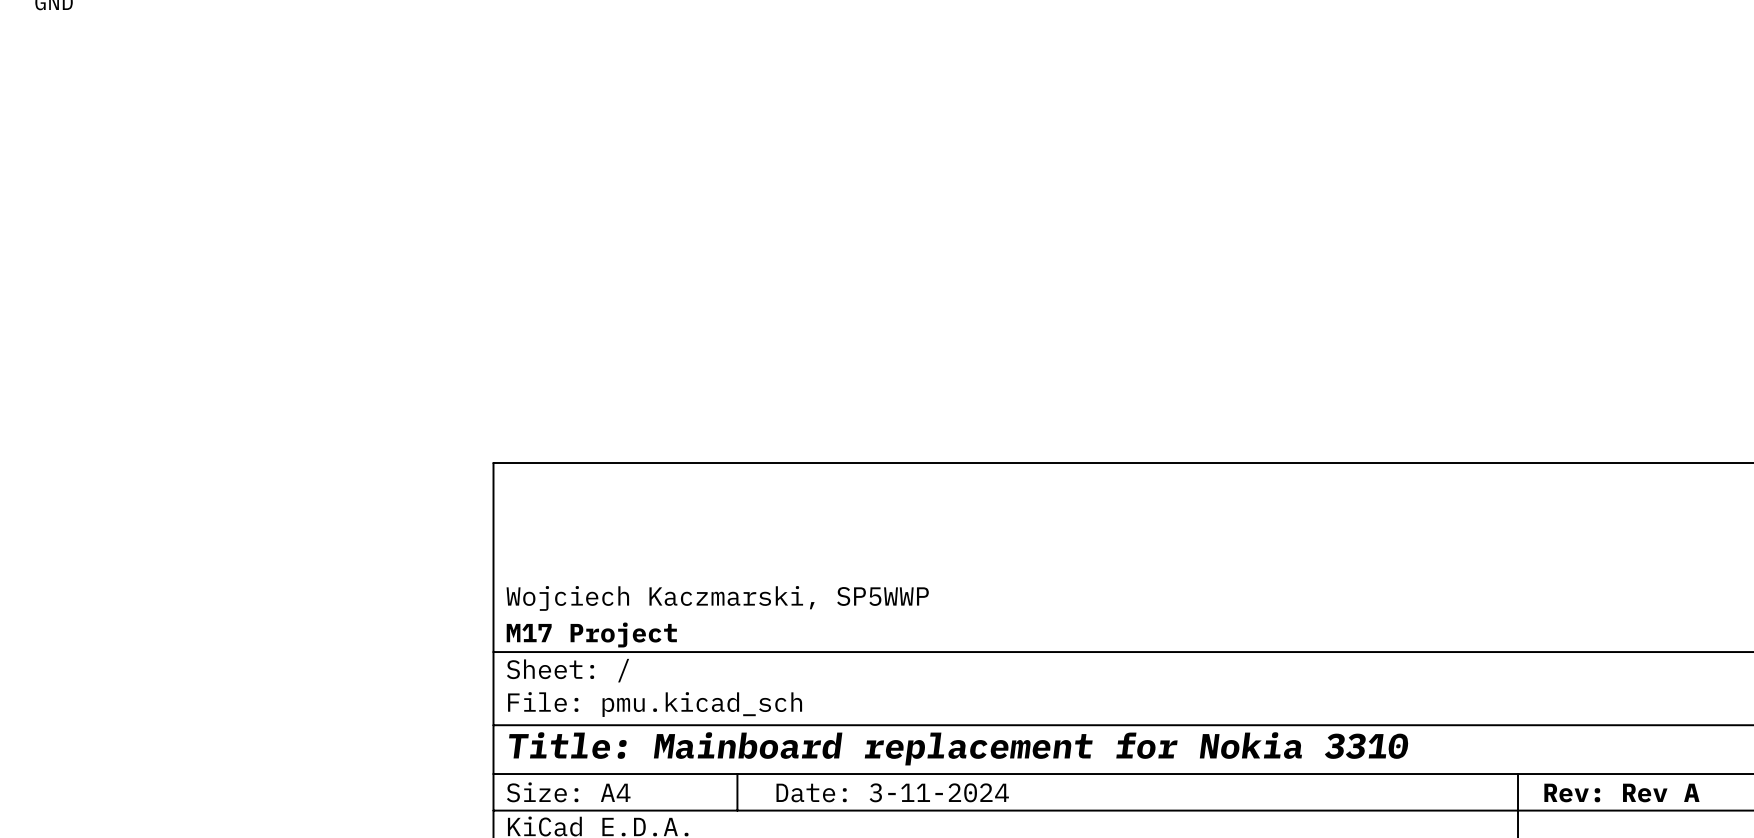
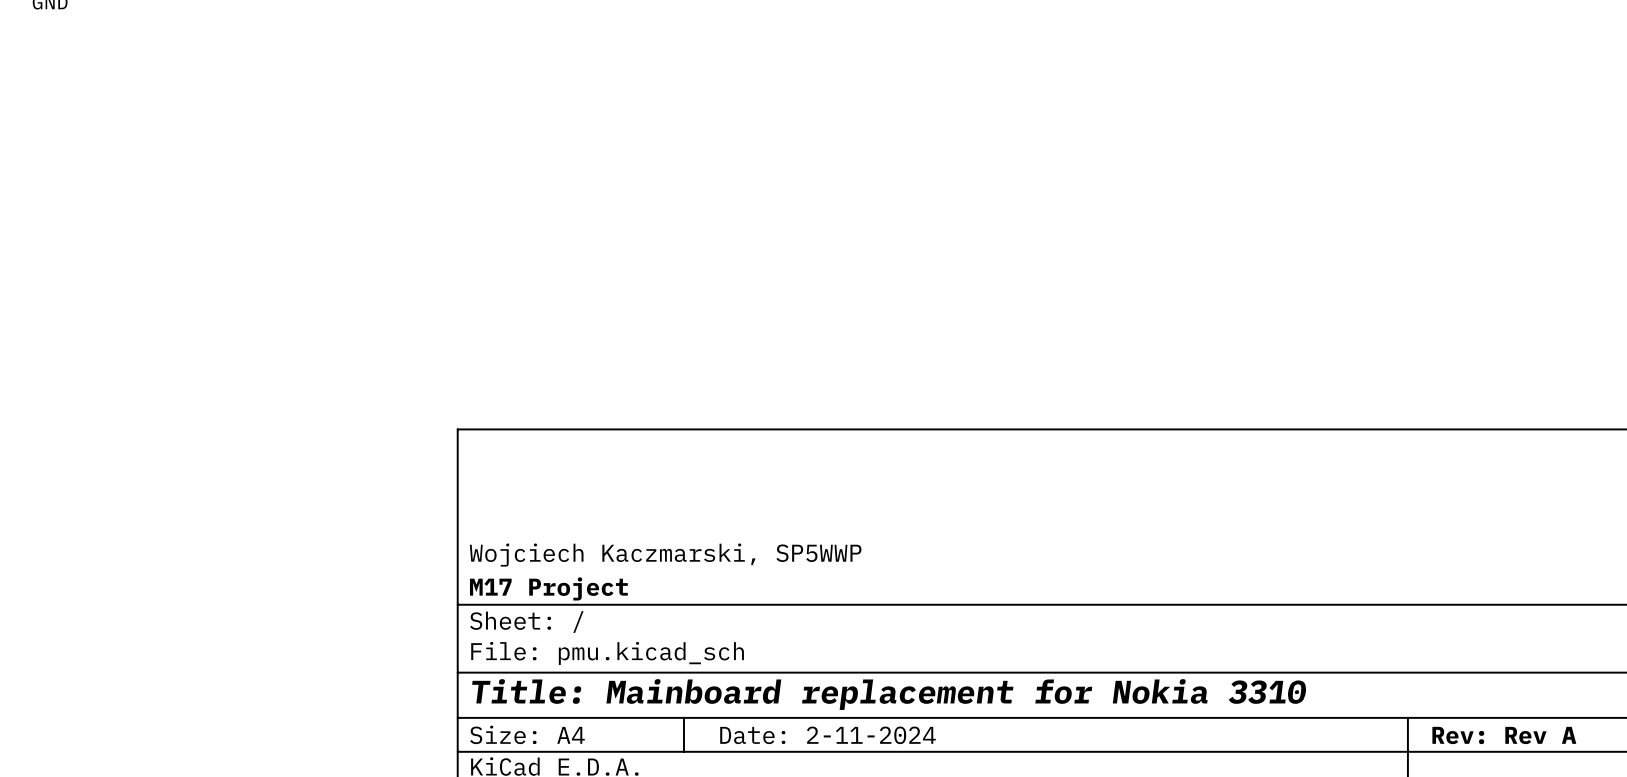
title block: Date: 3-11-2024 (892, 792) -> Date: 2-11-2024 (827, 735)

